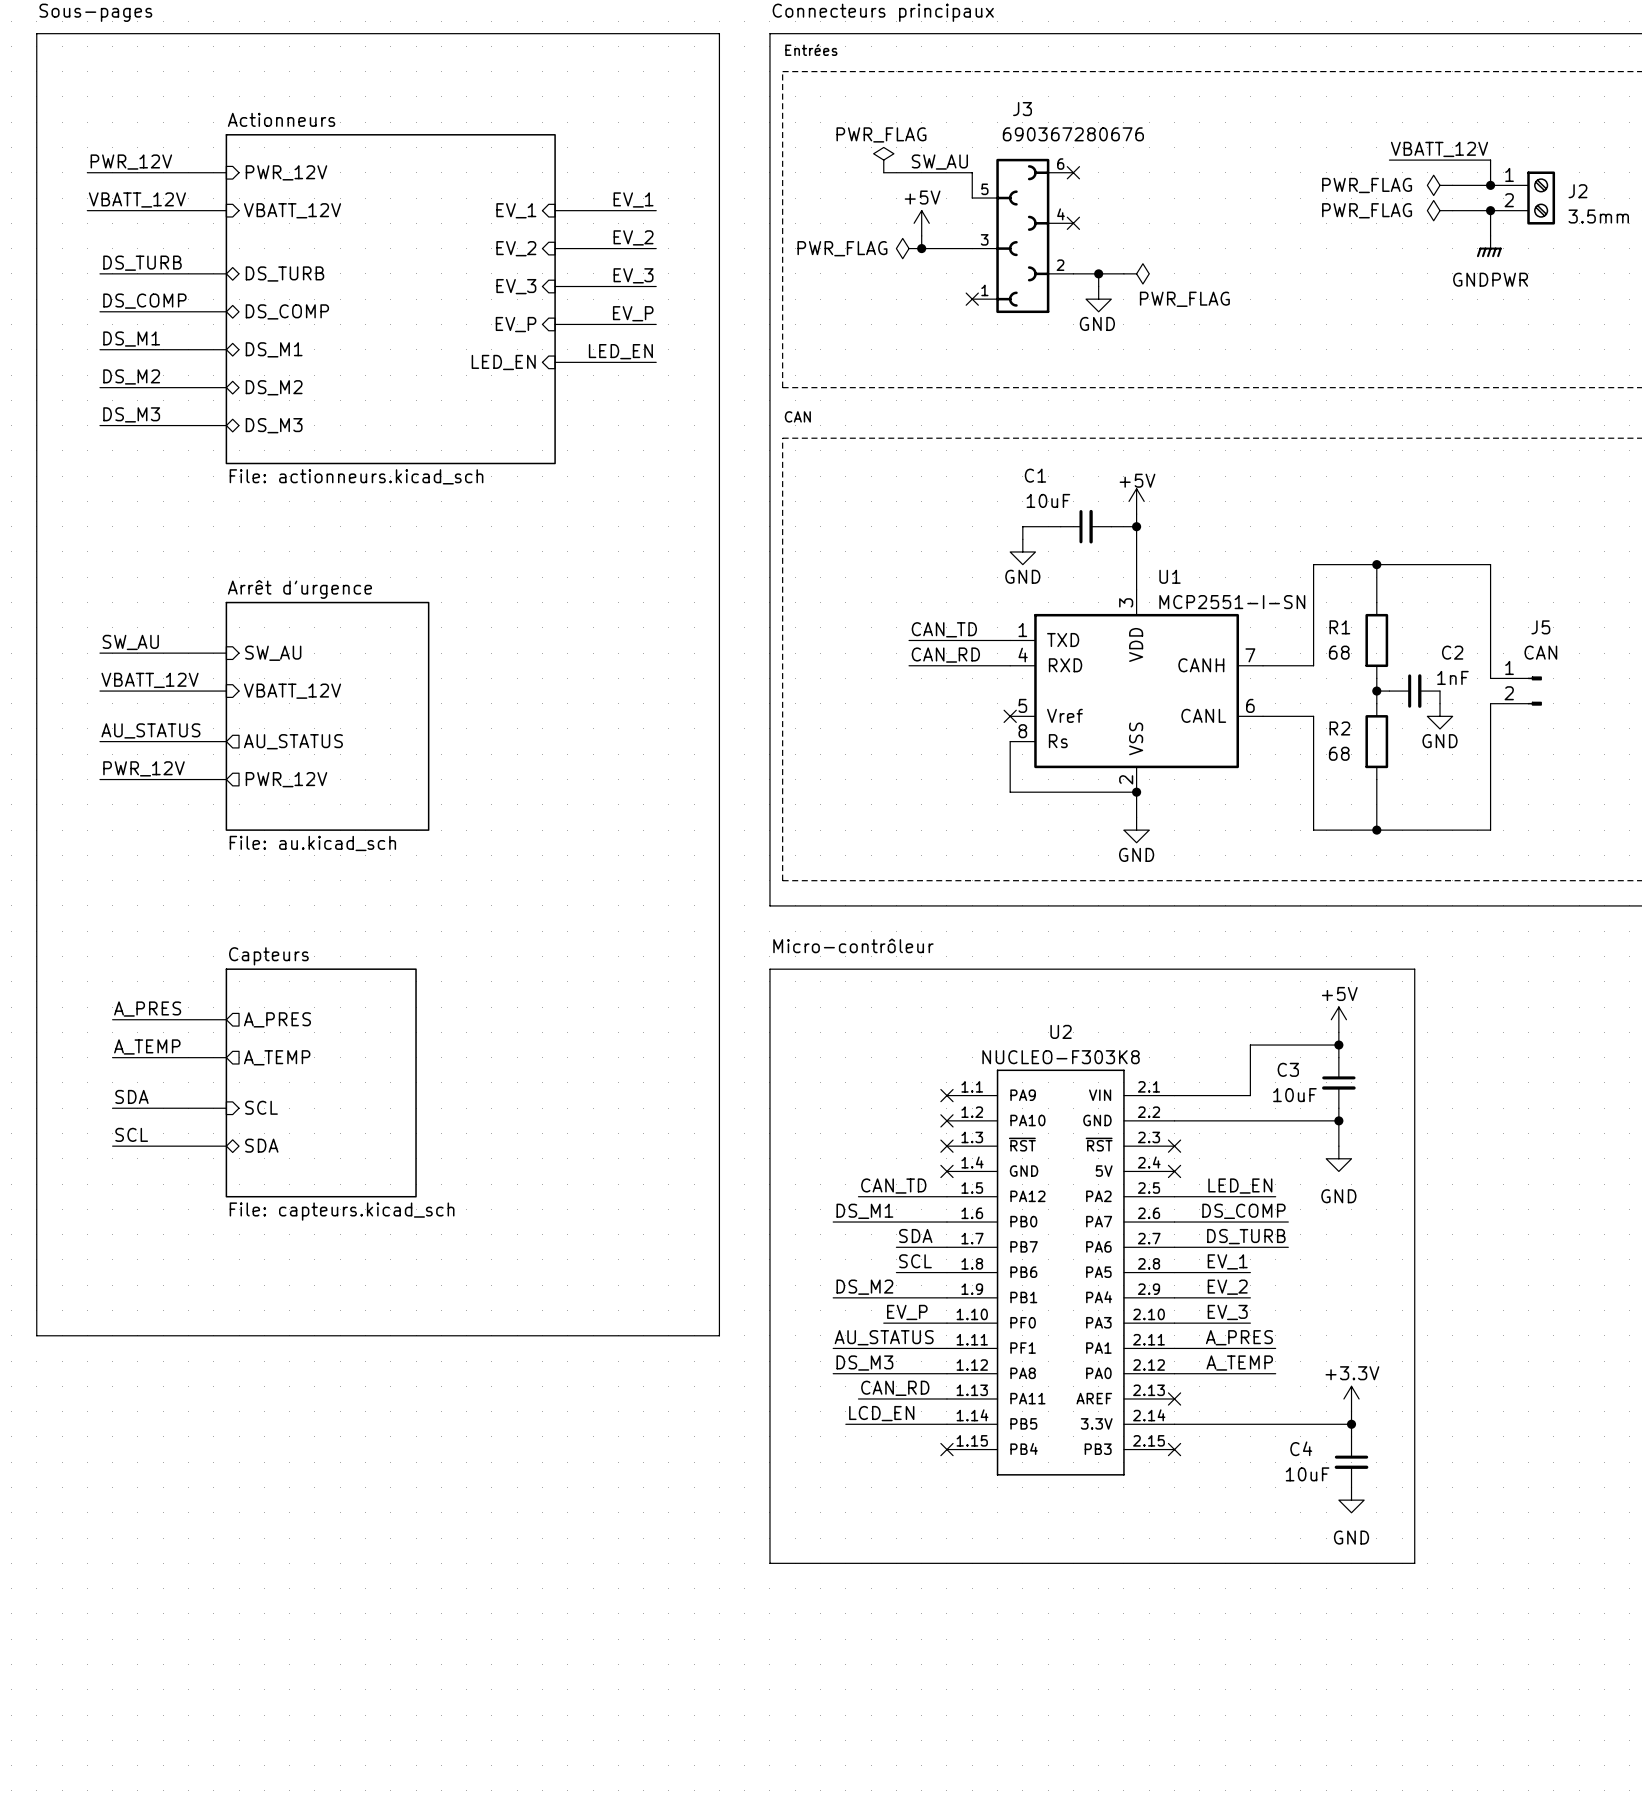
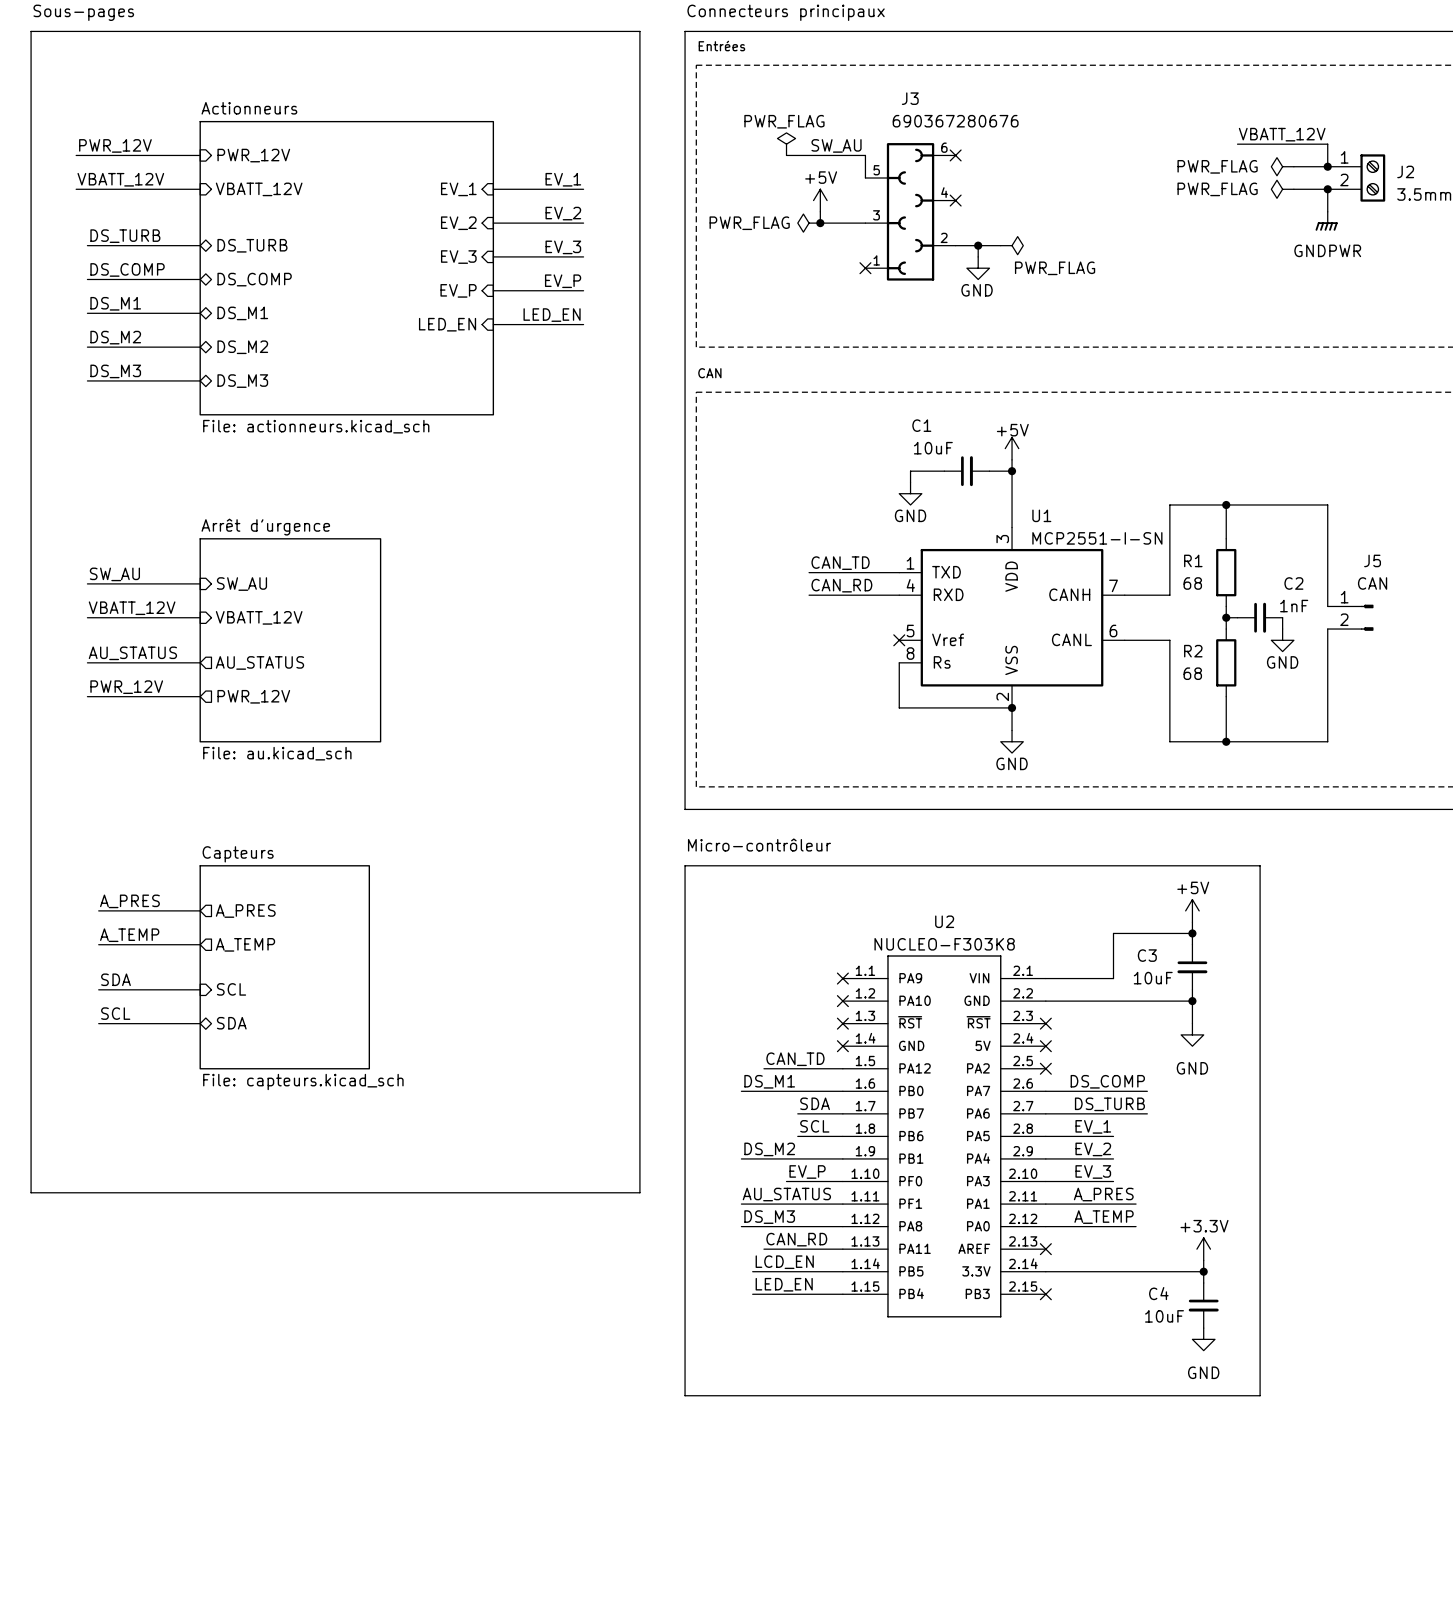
label: LED_EN (1240, 1186) -> none
wire: (1174, 1196) (1275, 1196) -> none
no-connect mark: none -> (1045, 1068)
label: none -> LED_EN (784, 1284)
wire: none -> (752, 1294) (842, 1294)
no-connect mark: (946, 1449) -> none

